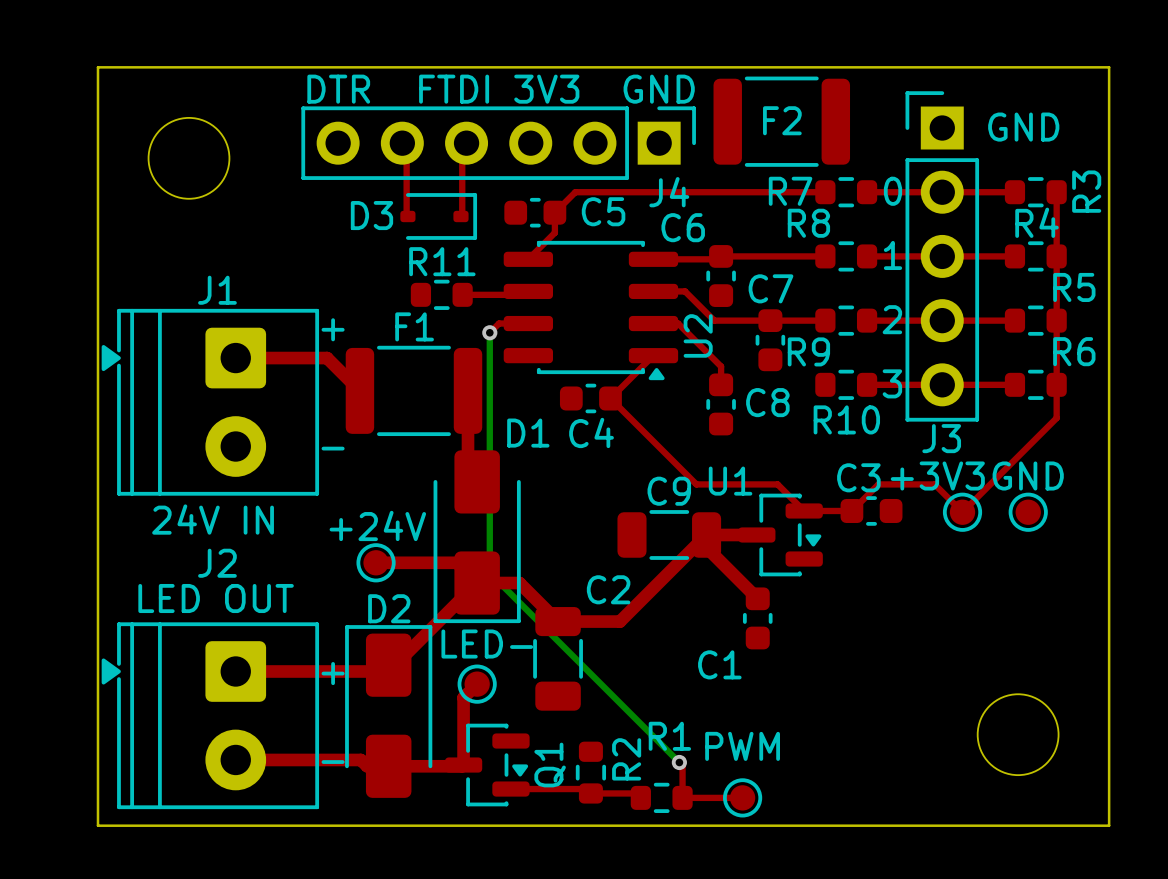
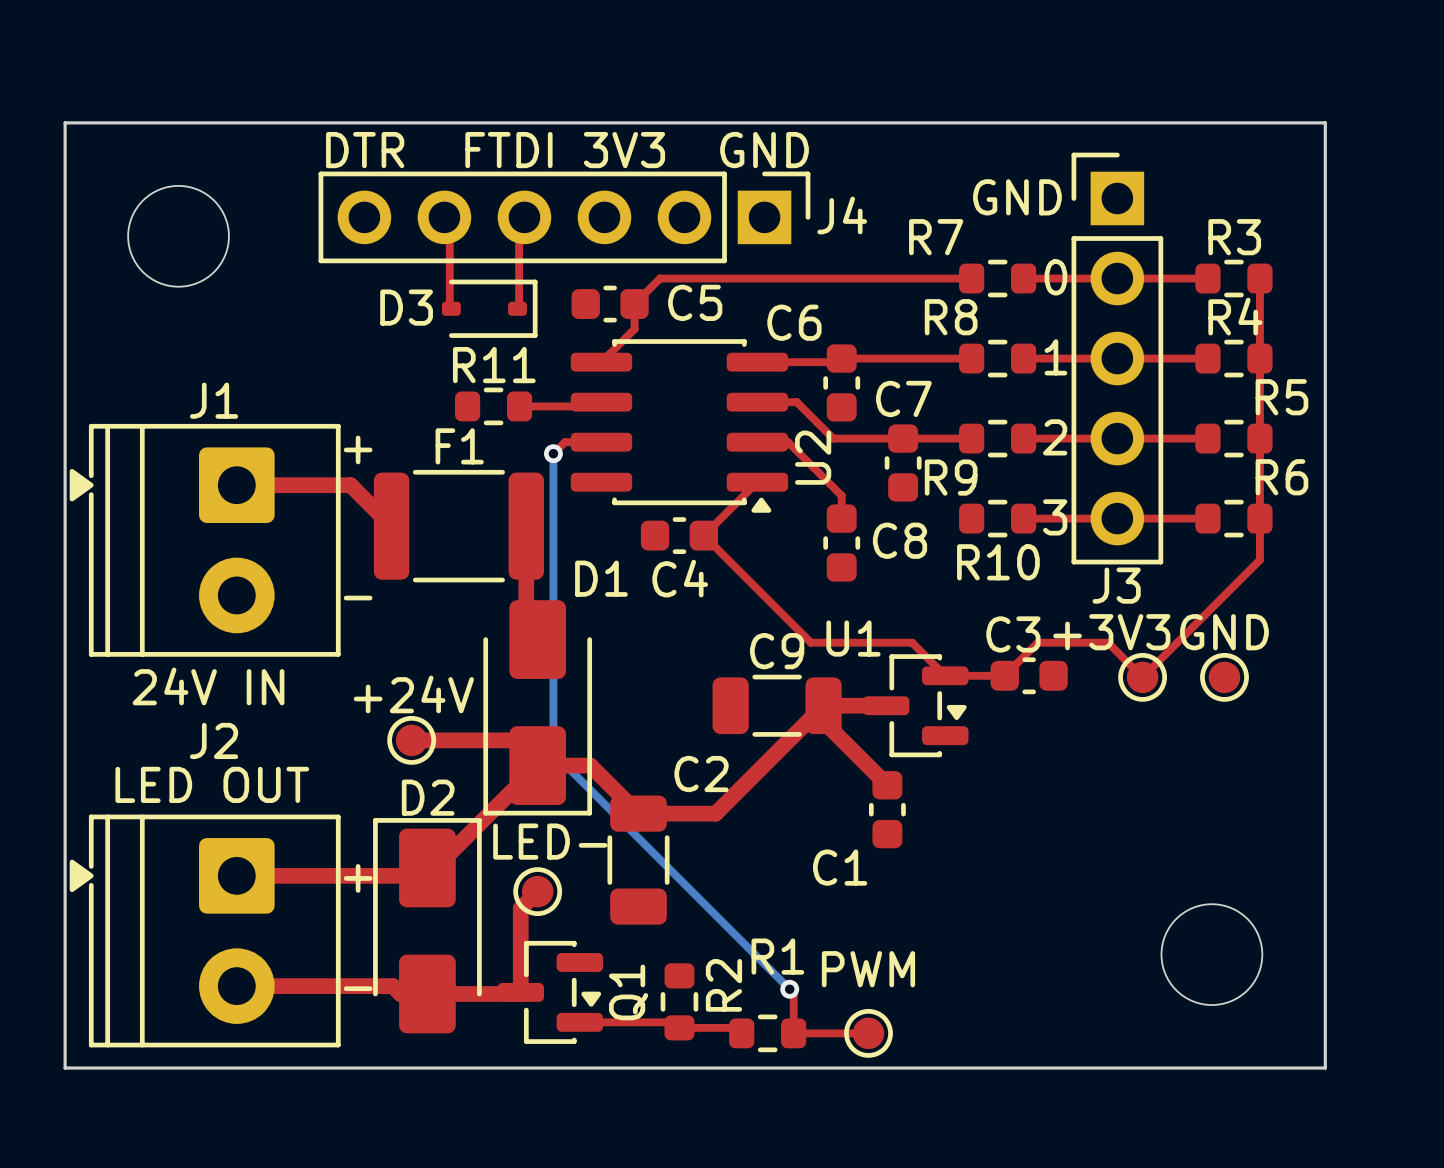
F2: (781, 121) -> none
text position: GND (1023, 127) -> GND (1017, 197)
R7 name position: R7 (790, 191) -> R7 (936, 237)
R3 name rotation: 0° (1086, 191) -> 90° clockwise (1234, 237)
J4 name position: J4 (669, 192) -> J4 (842, 215)

